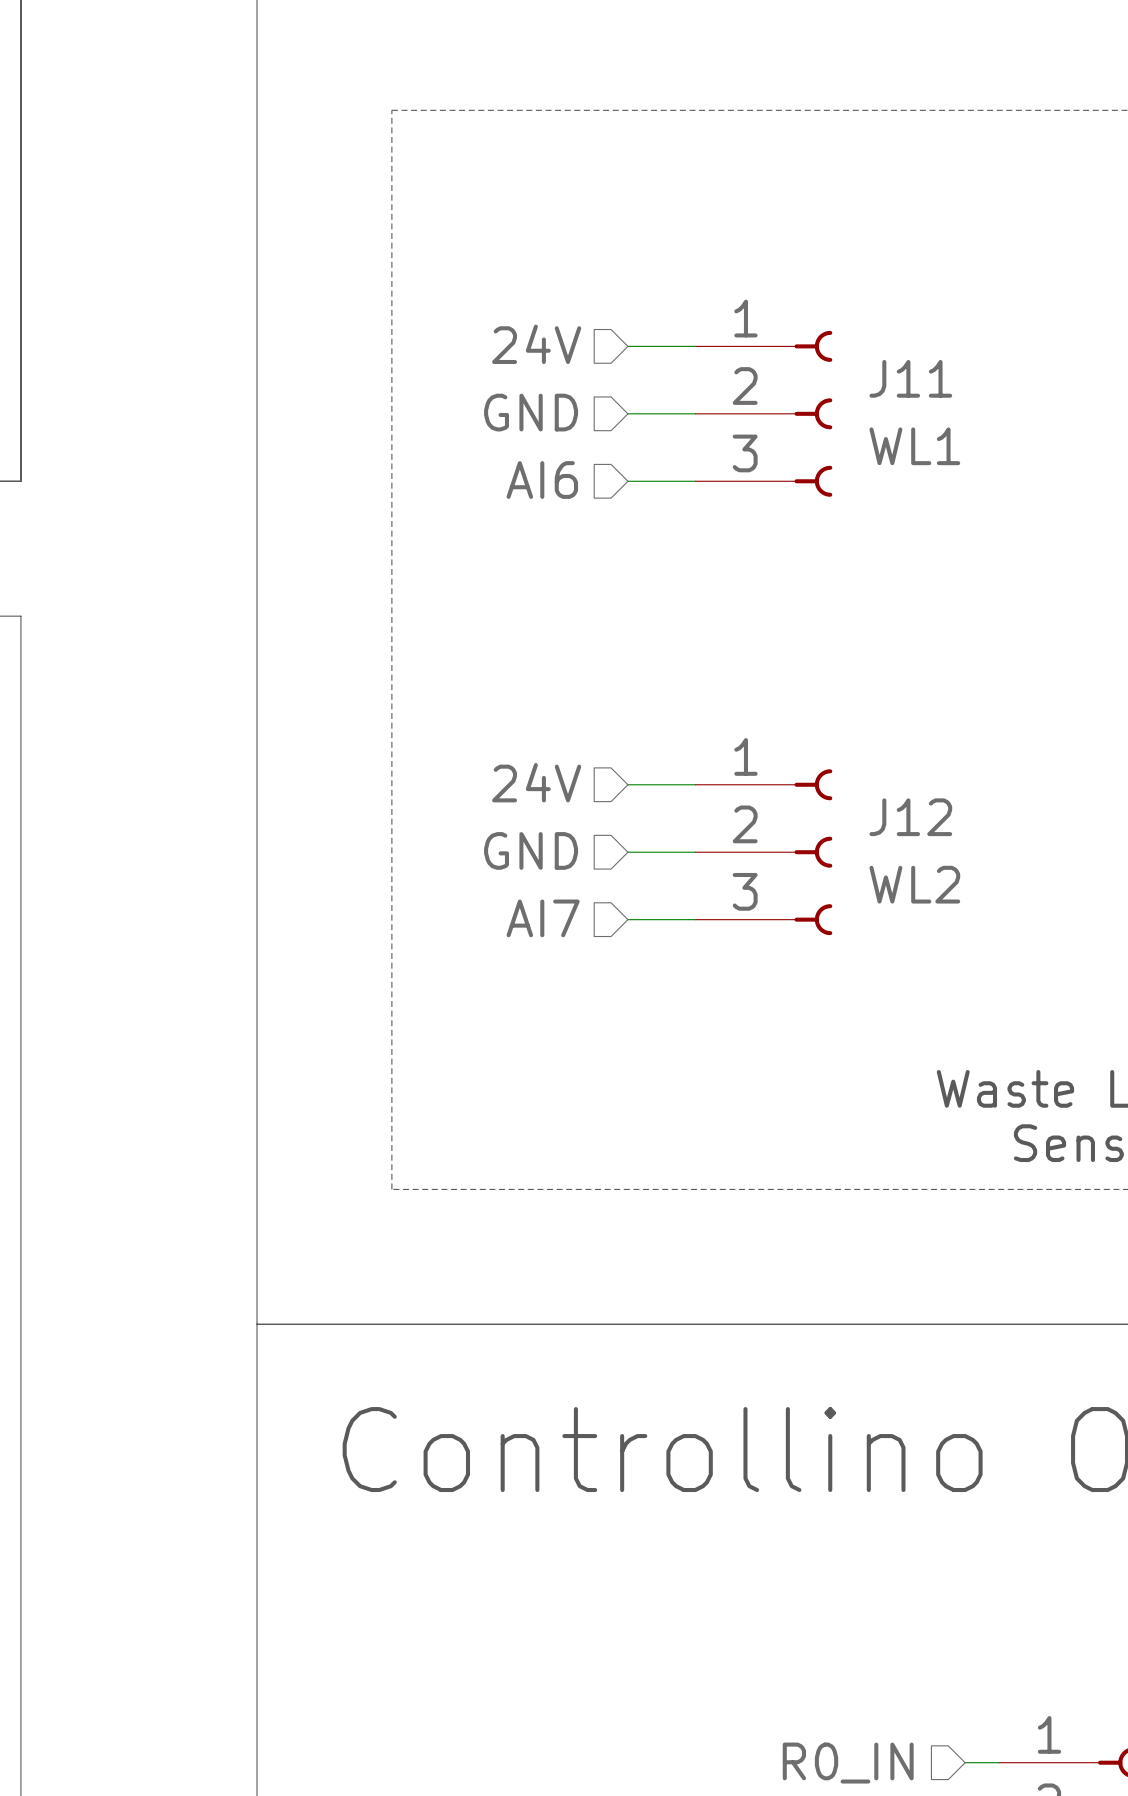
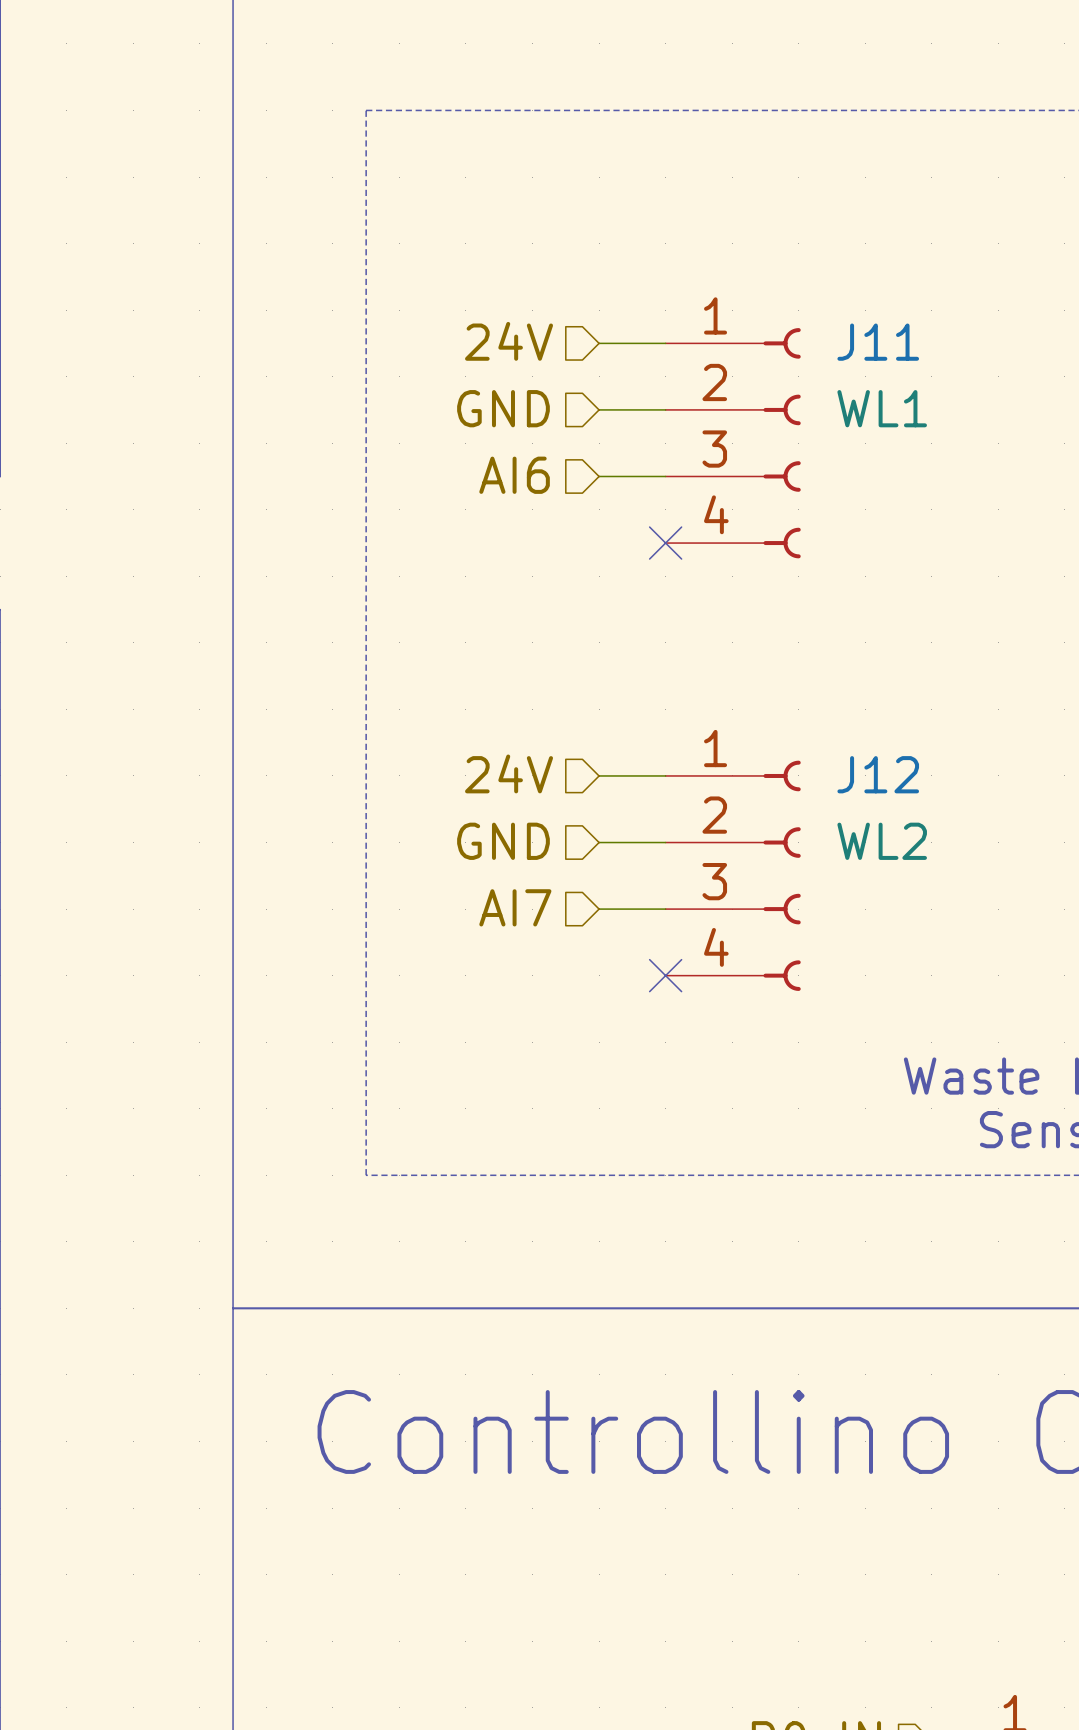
J11 symbol: [695, 330, 833, 497] -> [665, 328, 801, 559]
J11 name position: J11 (910, 378) -> J11 (878, 342)
J11 value position: WL1 (914, 446) -> WL1 (882, 408)
no-connect mark: none -> (665, 543)
J12 symbol: [695, 769, 833, 936] -> [665, 760, 801, 991]
J12 name position: J12 (910, 817) -> J12 (878, 774)
J12 value position: WL2 (914, 884) -> WL2 (882, 841)
no-connect mark: none -> (665, 975)

